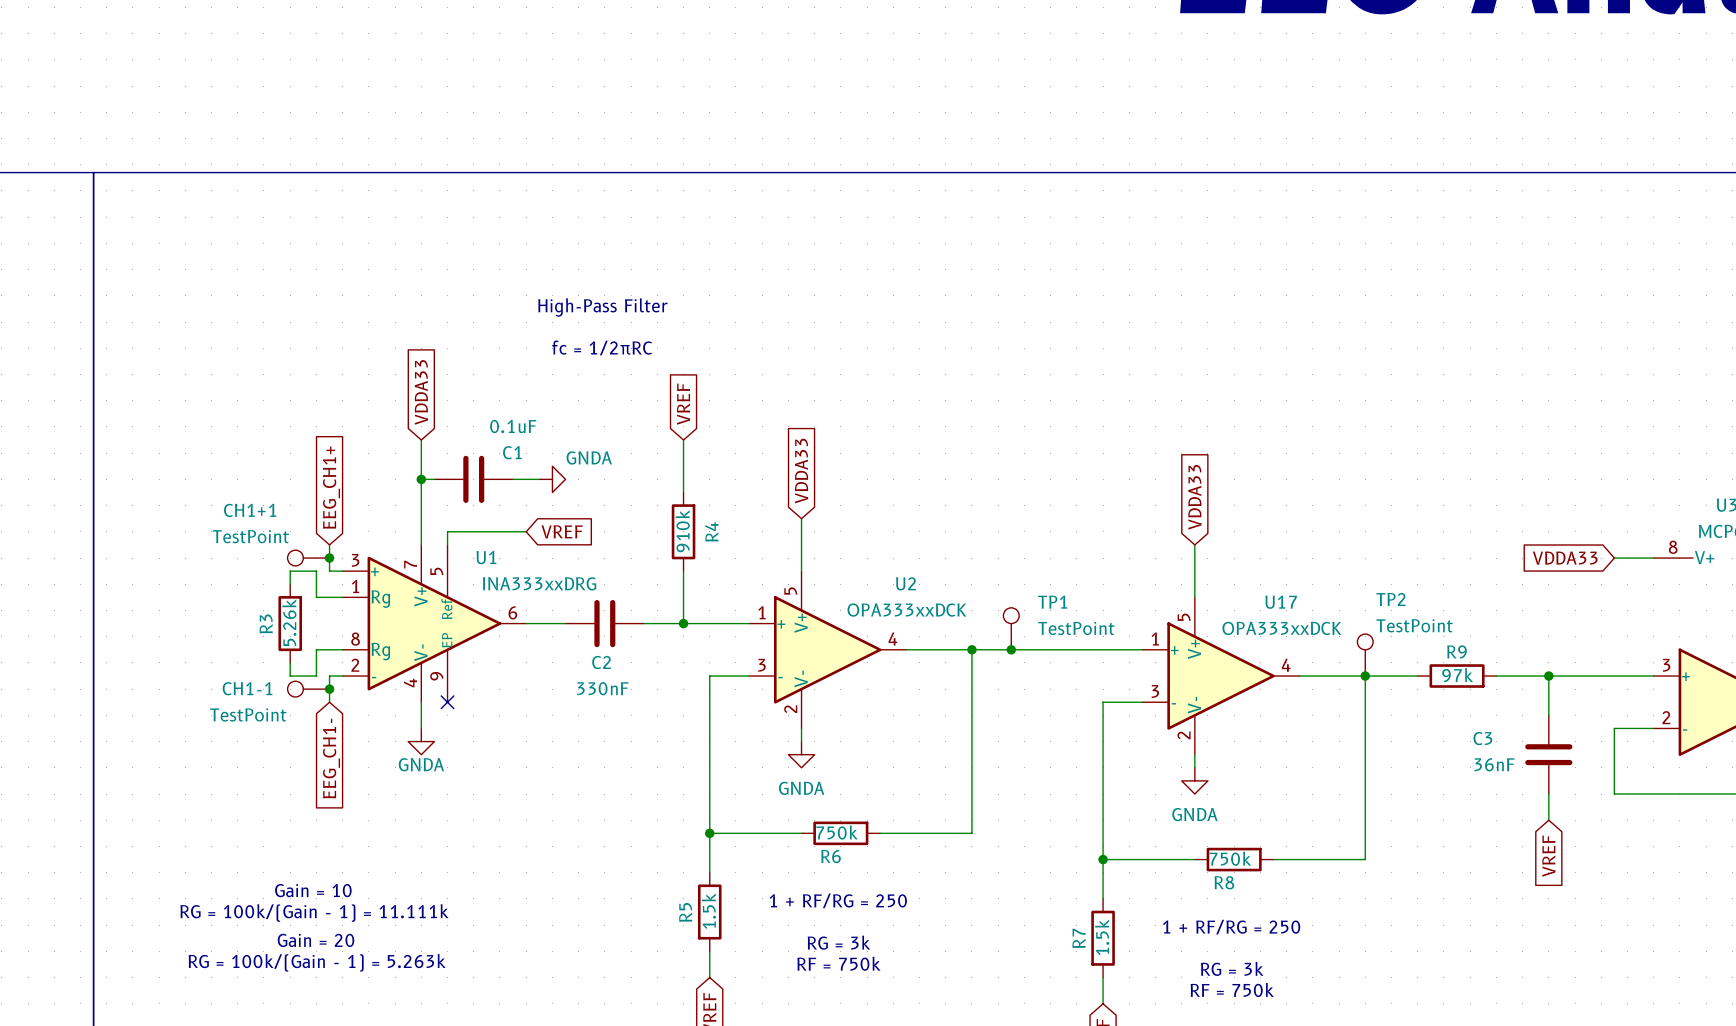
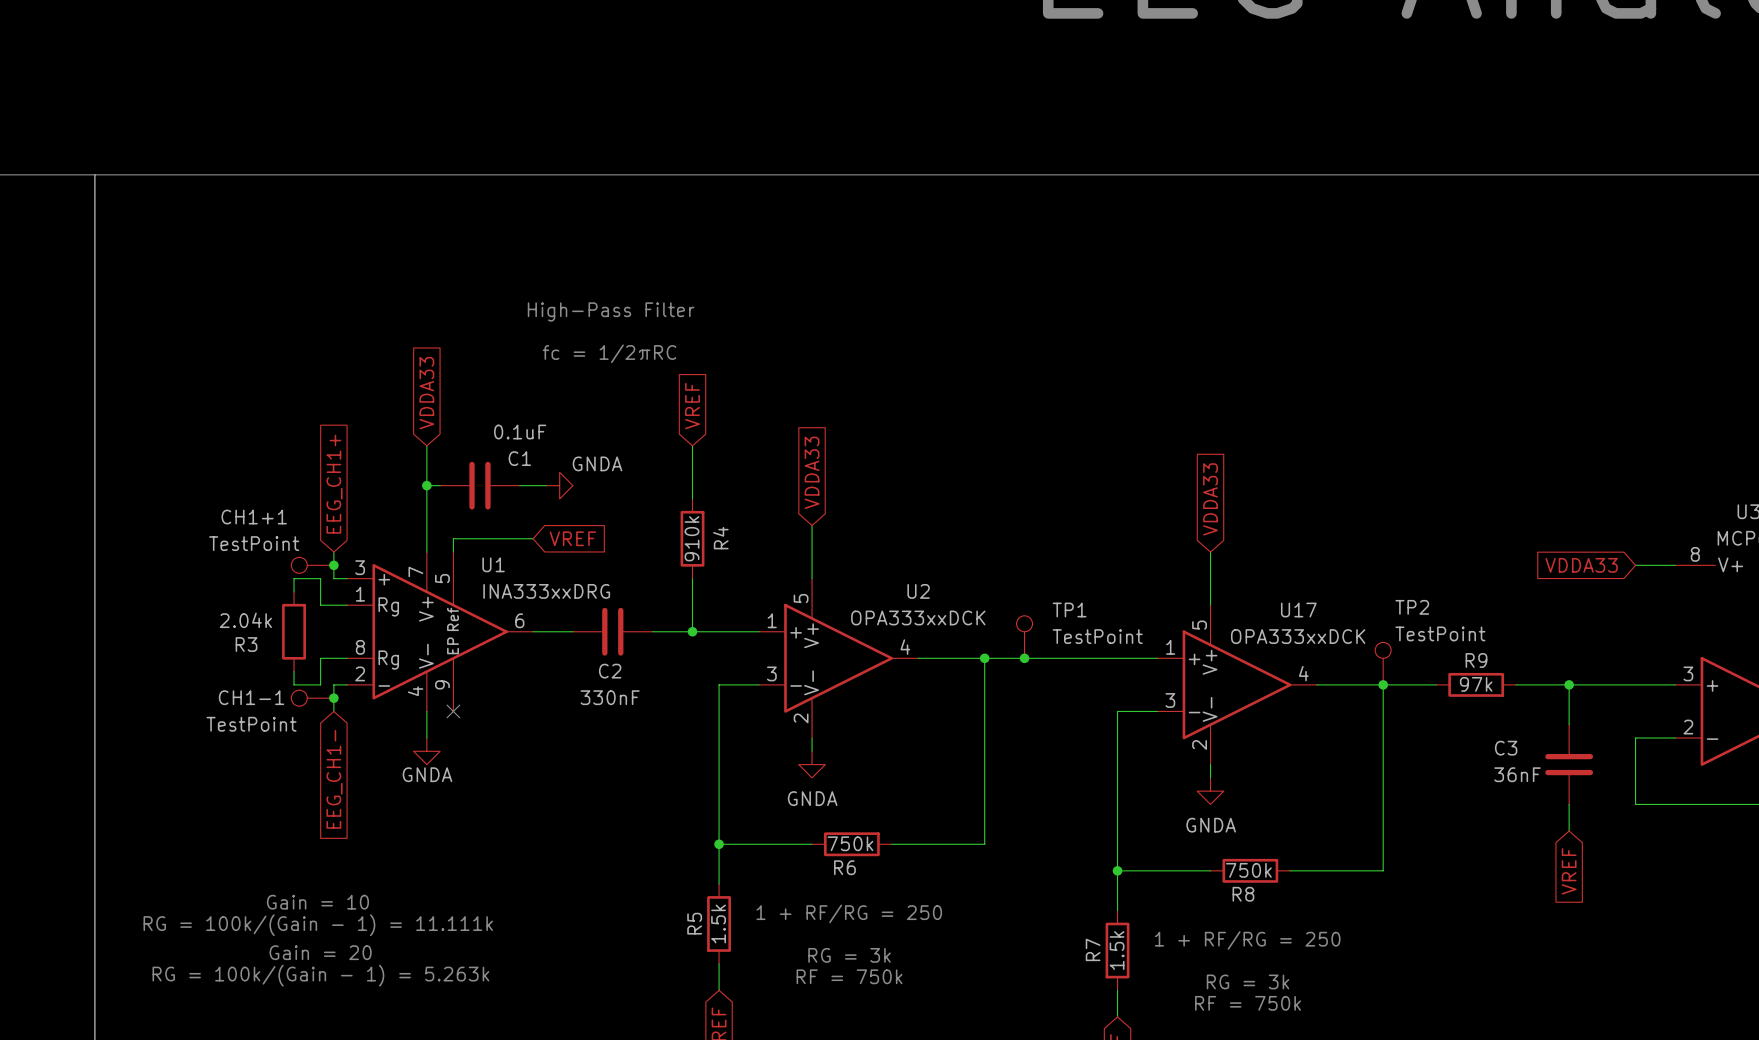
R3 value: 5.26k (289, 622) -> 2.04k (245, 620)
R3 name rotation: 0° (266, 623) -> 90° clockwise (246, 644)

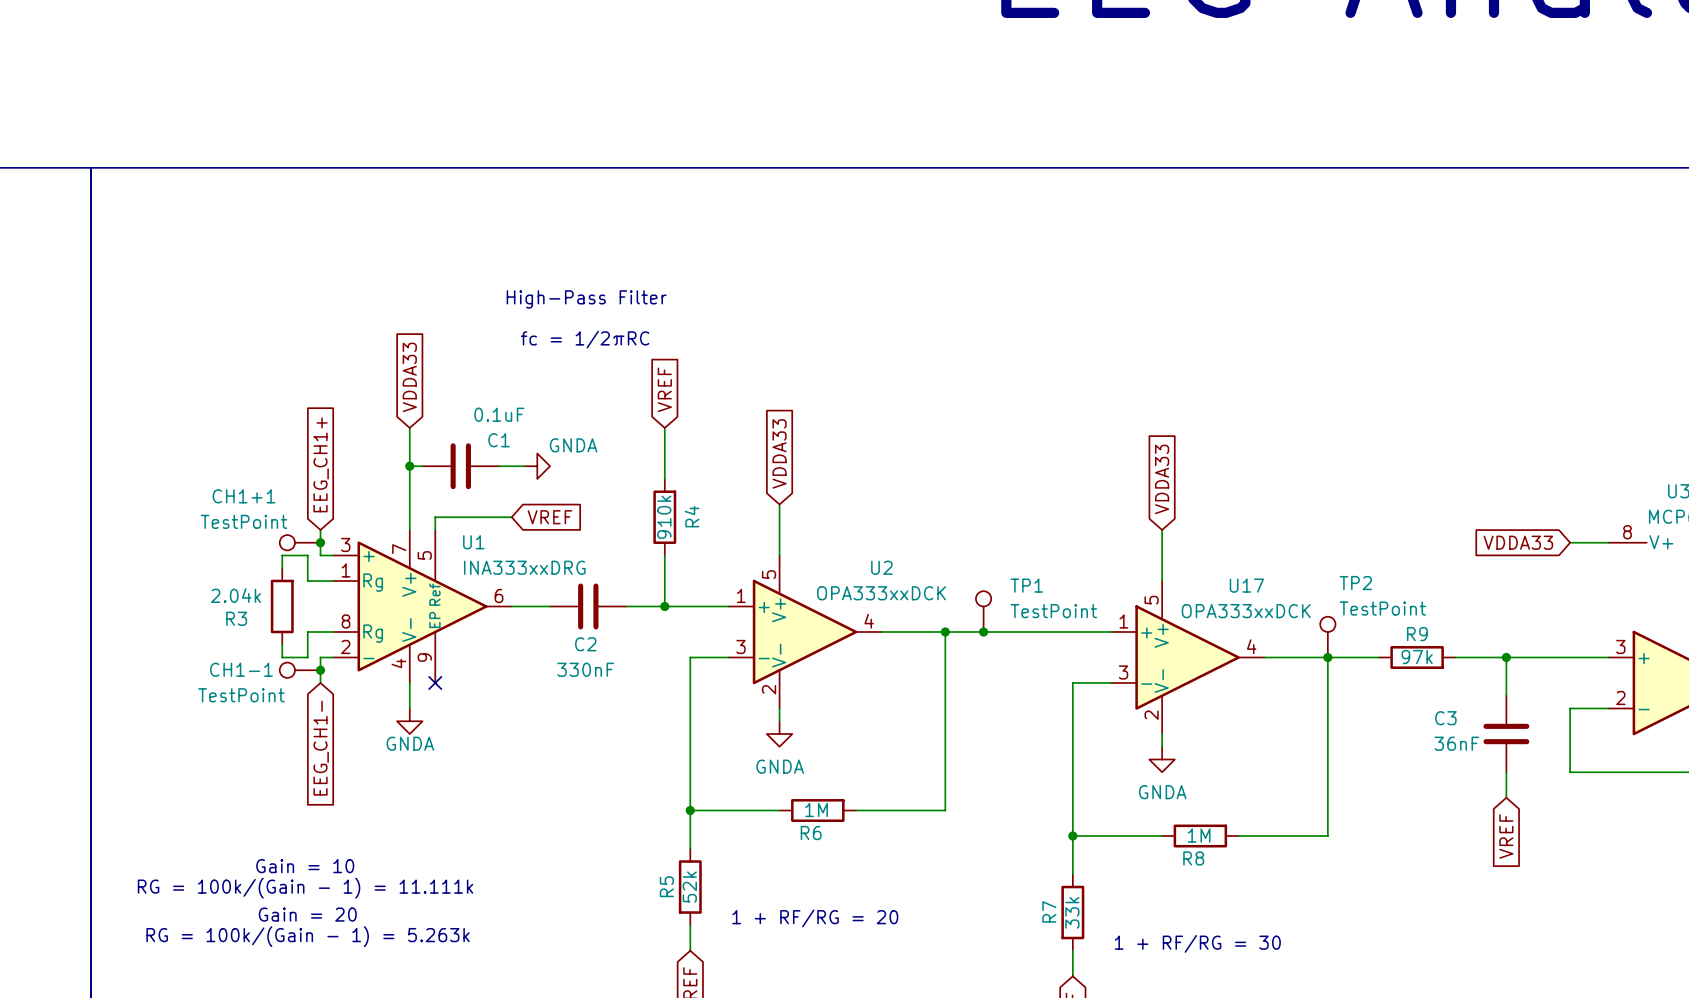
R6 value: 750k (850, 843) -> 1M (816, 810)
R8 value: 750k (1248, 870) -> 1M (1199, 835)
text: 1 + RF/RG = 250 (849, 913) -> none
R5 value: 1.5k (718, 923) -> 52k (689, 887)
text: 1 + RF/RG = 250 (1247, 940) -> none
R7 value: 1.5k (1117, 950) -> 33k (1072, 912)
text: RG = 3k (849, 955) -> 1 + RF/RG = 20 (815, 918)
text: RF = 750k (849, 976) -> none
text: RG = 3k (1248, 981) -> 1 + RF/RG = 30 (1197, 943)
text: RF = 750k (1248, 1003) -> none

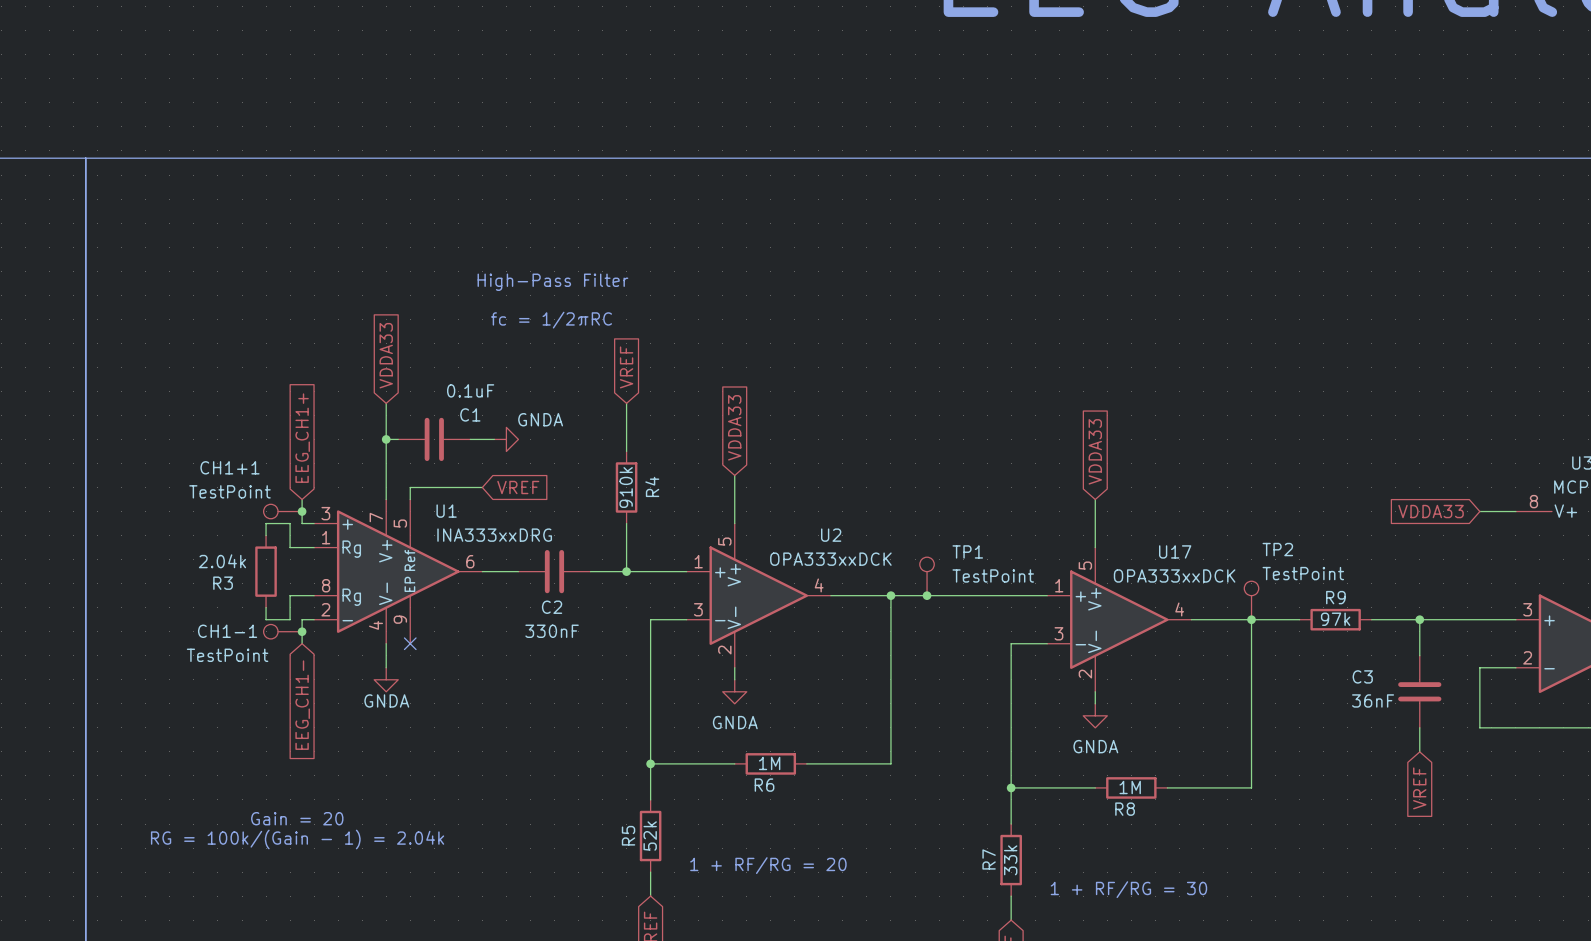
text: Gain = 10 (305, 866) -> none
text: RG = 100k/(Gain - 1) = 11.111k (305, 888) -> RG = 100k/(Gain - 1) = 2.04k (297, 839)
text position: Gain = 20 (307, 914) -> Gain = 20 (297, 818)
text: RG = 100k/(Gain - 1) = 5.263k (308, 936) -> none

